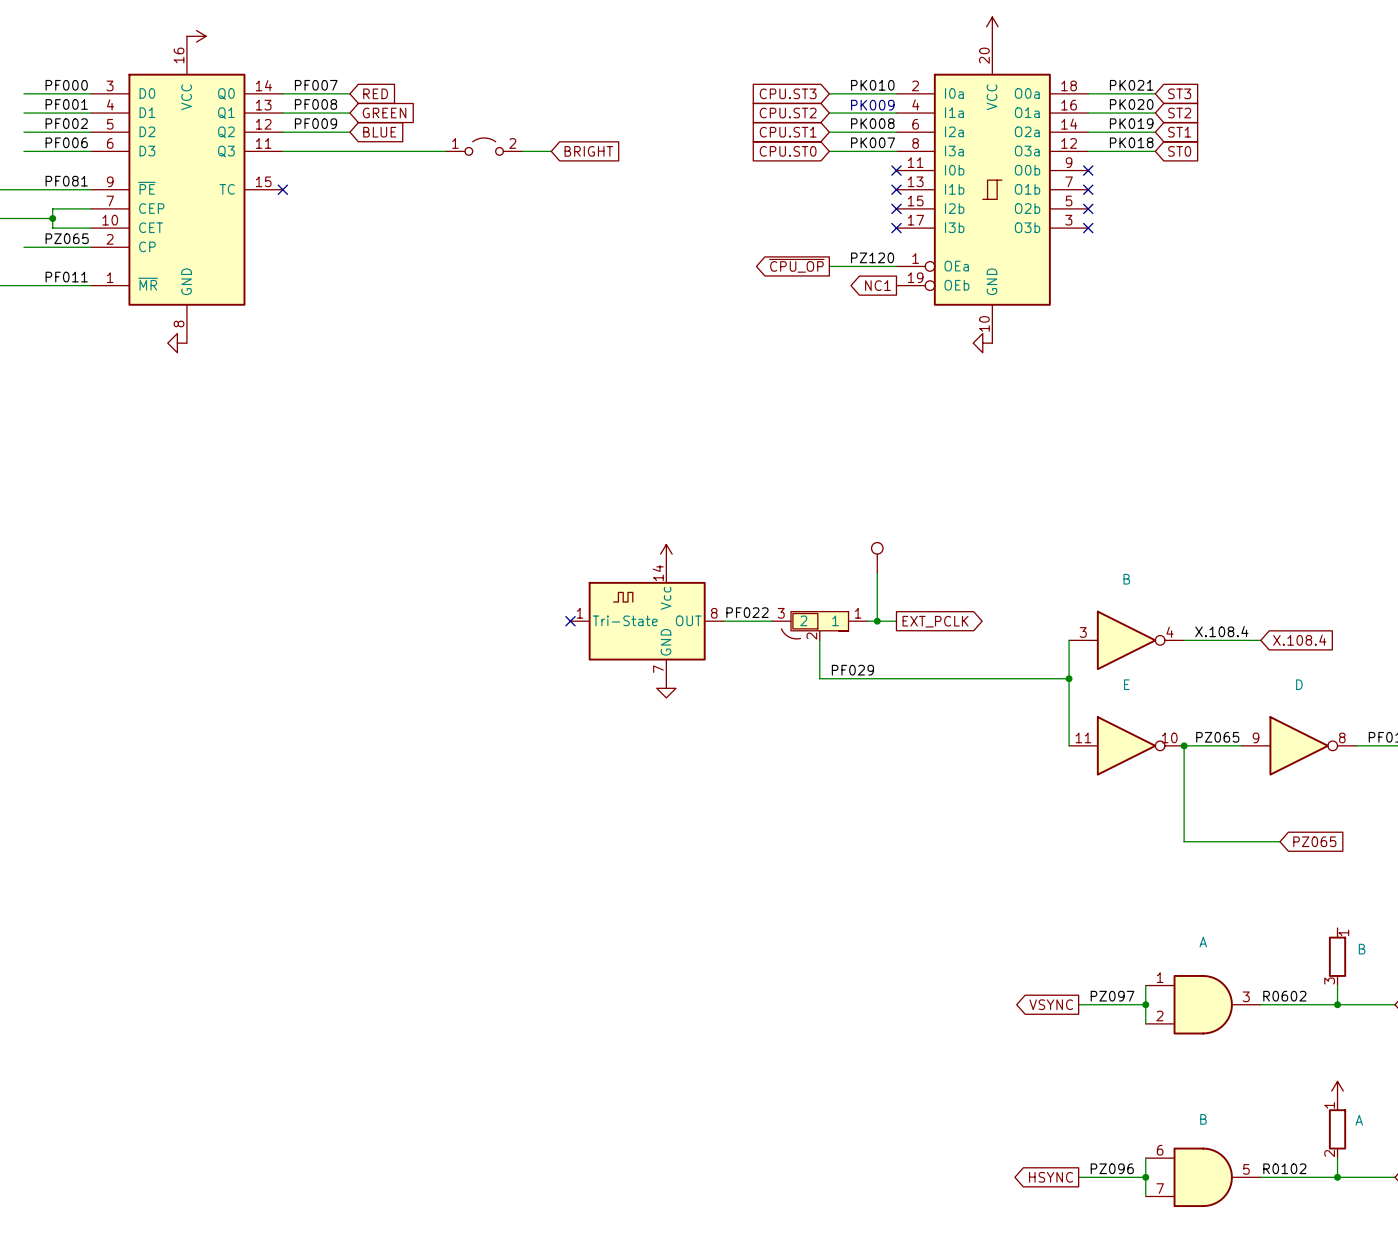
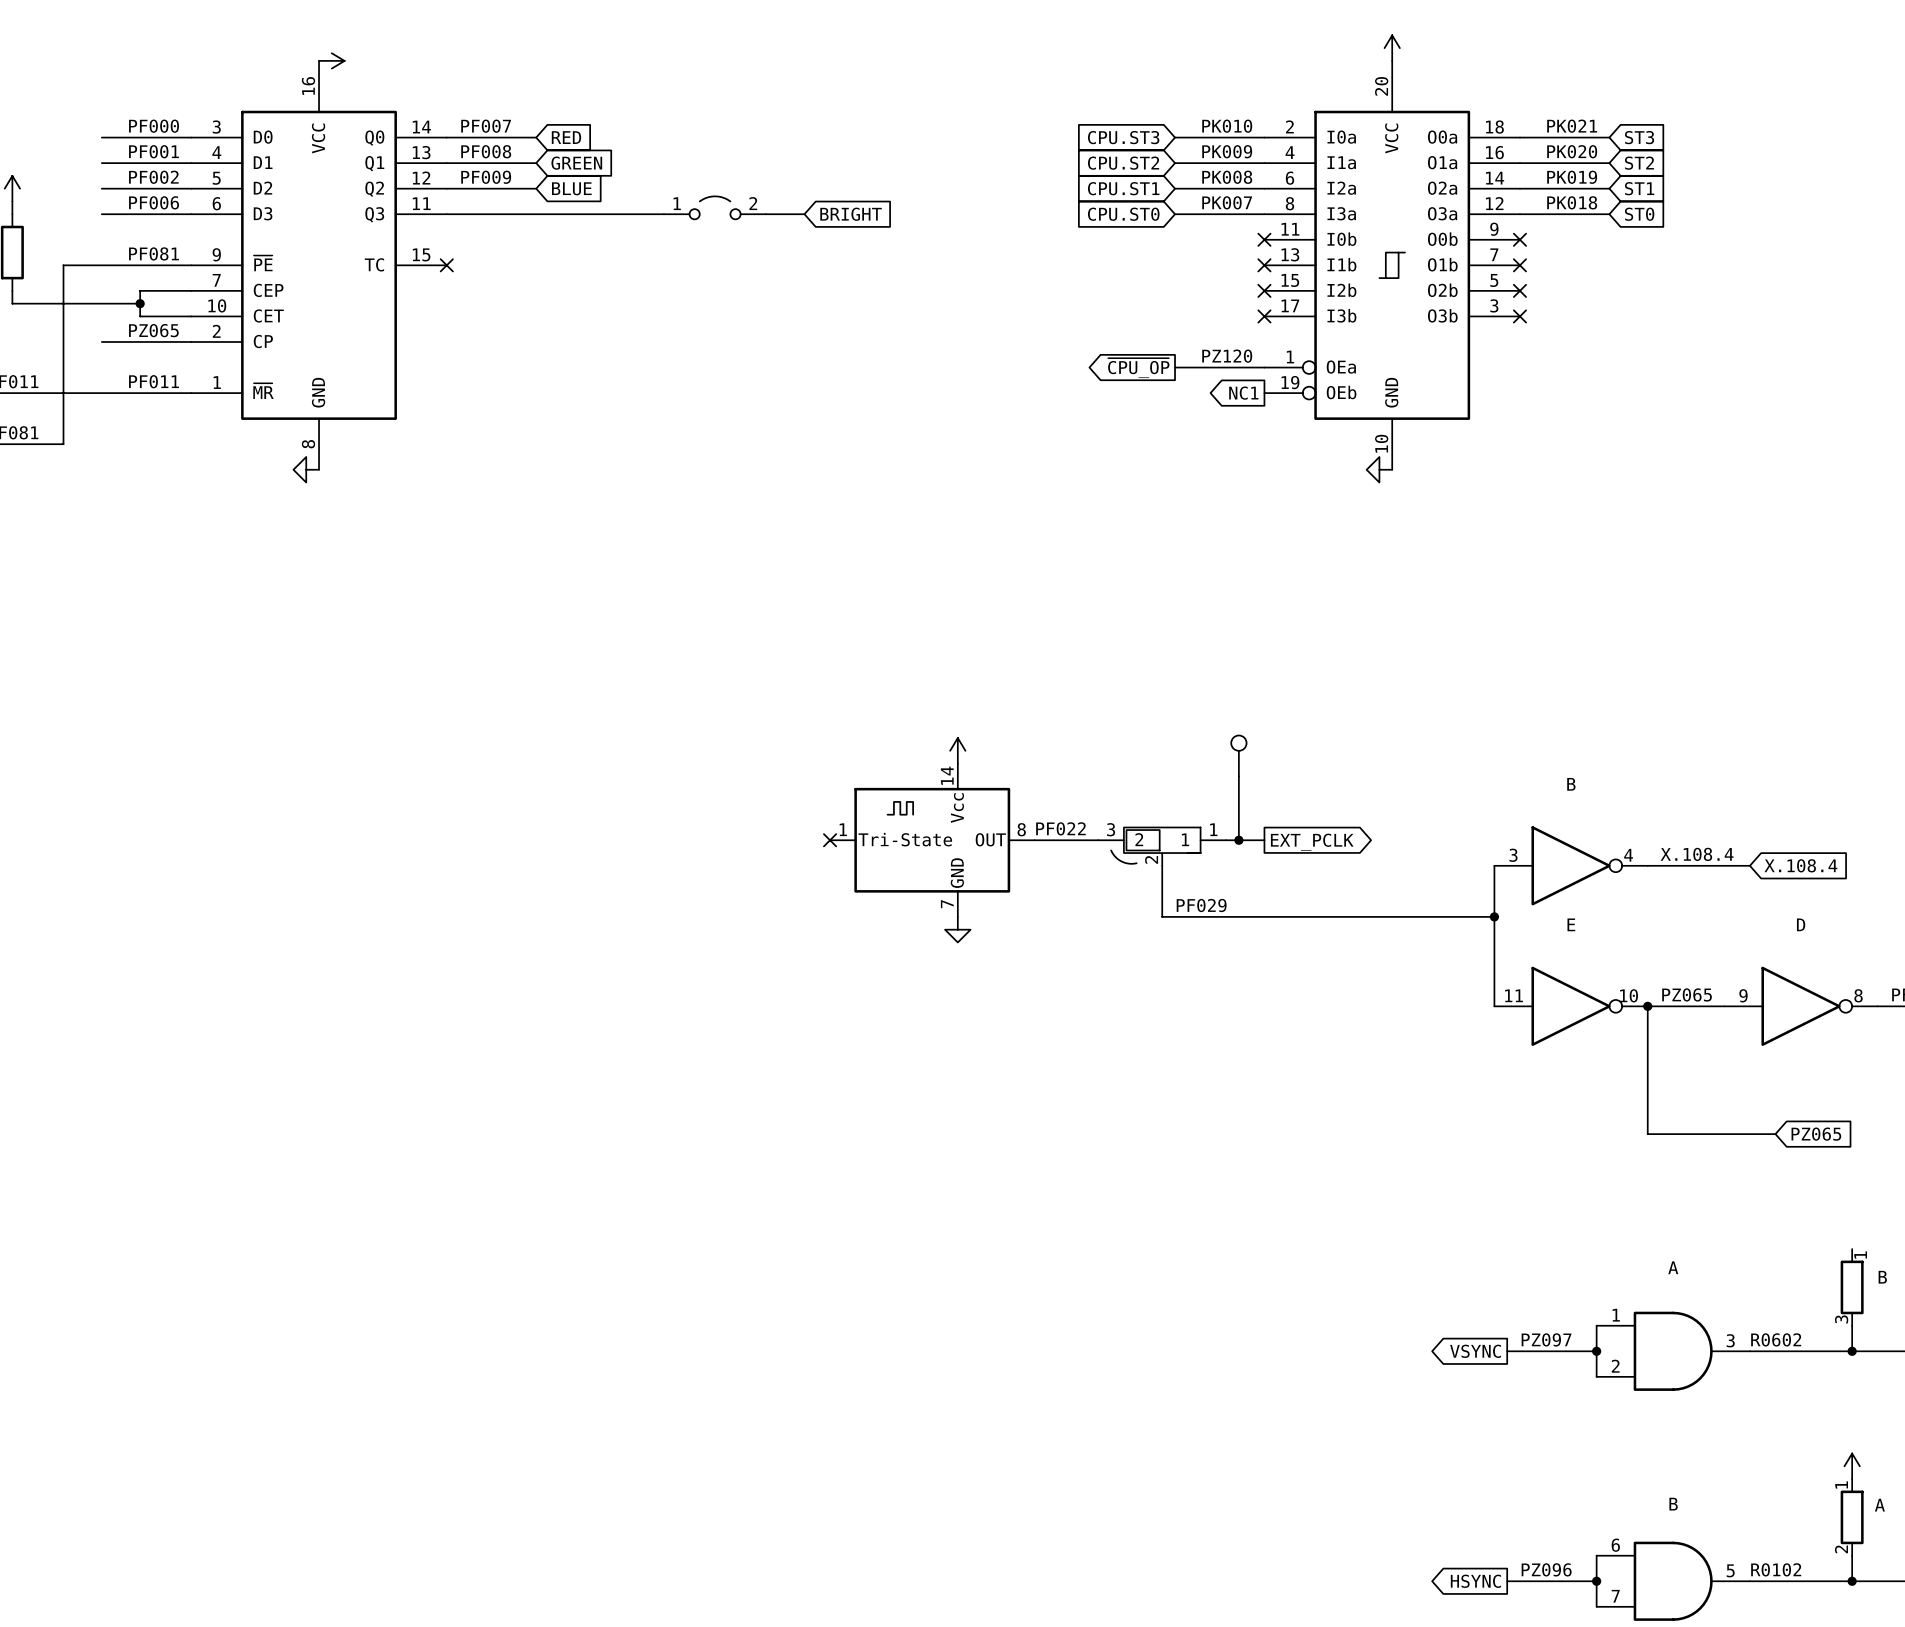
label: none -> PK009 (1227, 151)
text: PK009 (872, 105) -> none

